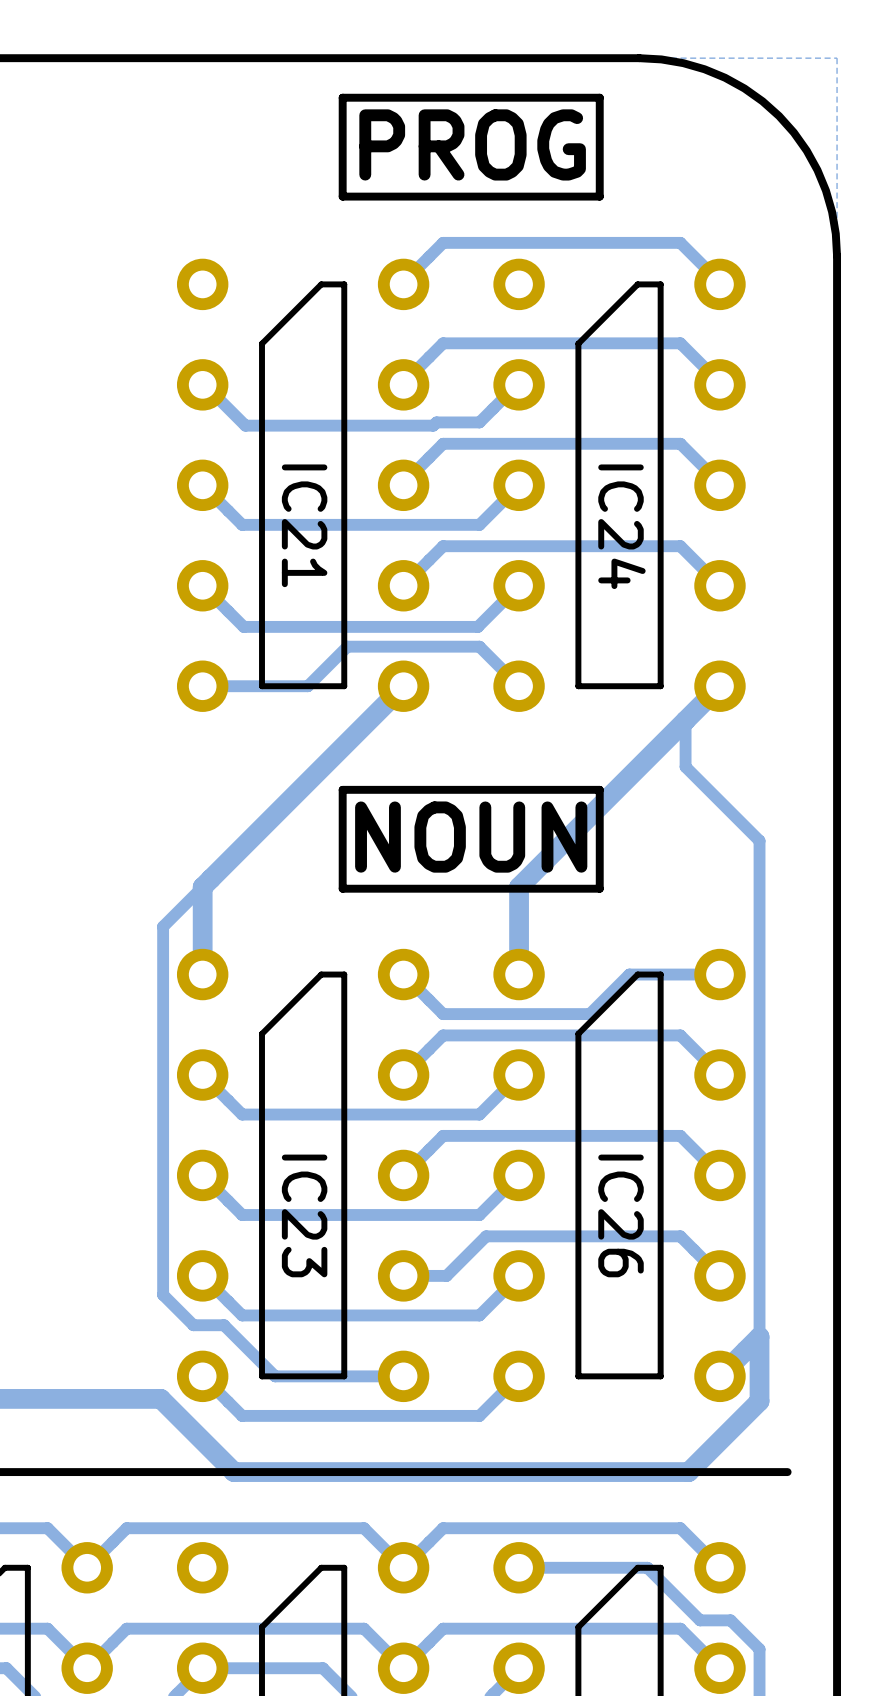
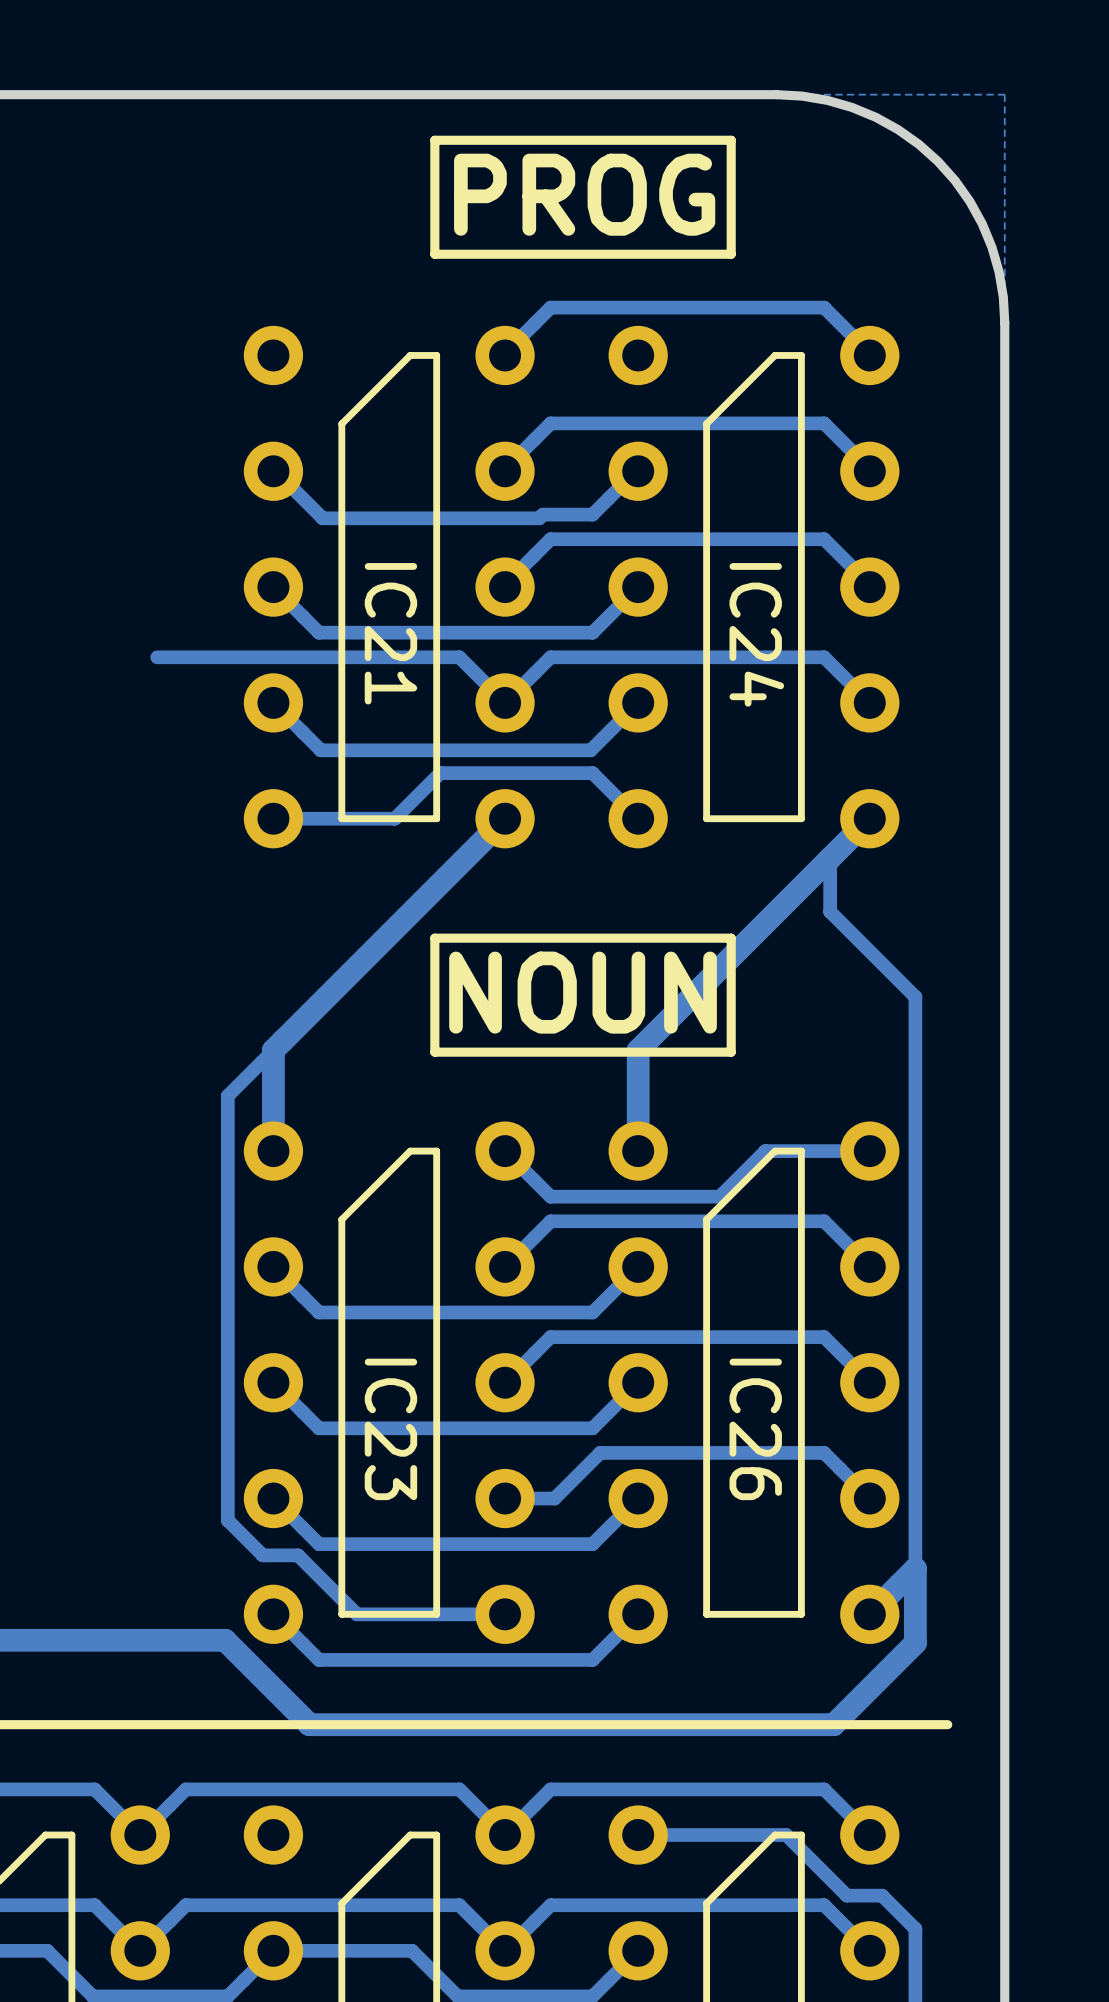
track: none -> (157, 657) (459, 657) (505, 702)

